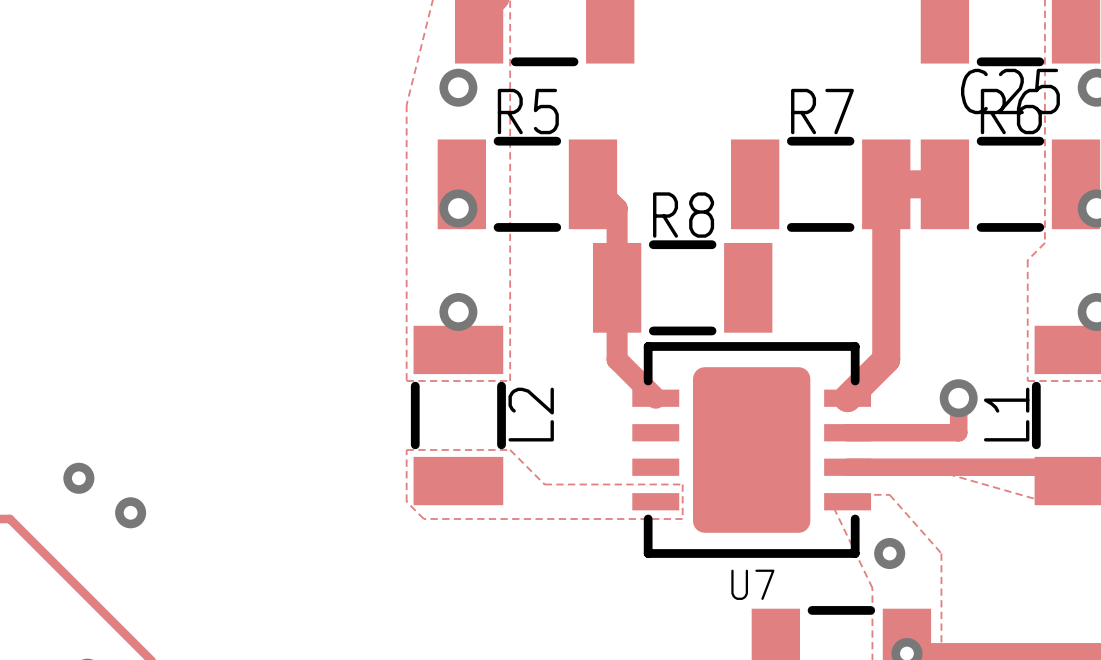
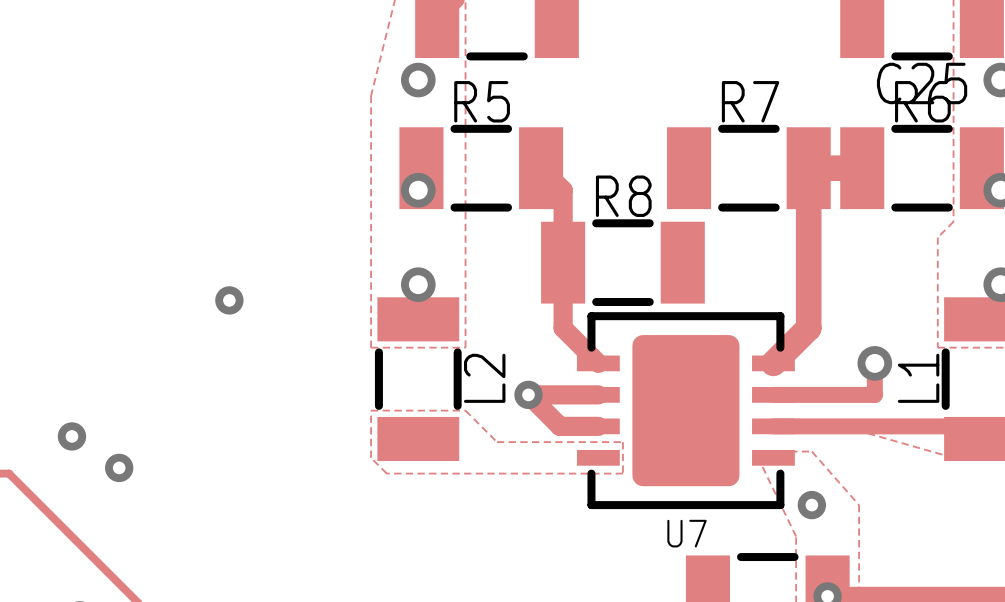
via: none -> (229, 300)
via: none -> (528, 394)
track: none -> (598, 394) (528, 394) (559, 426) (598, 426)

